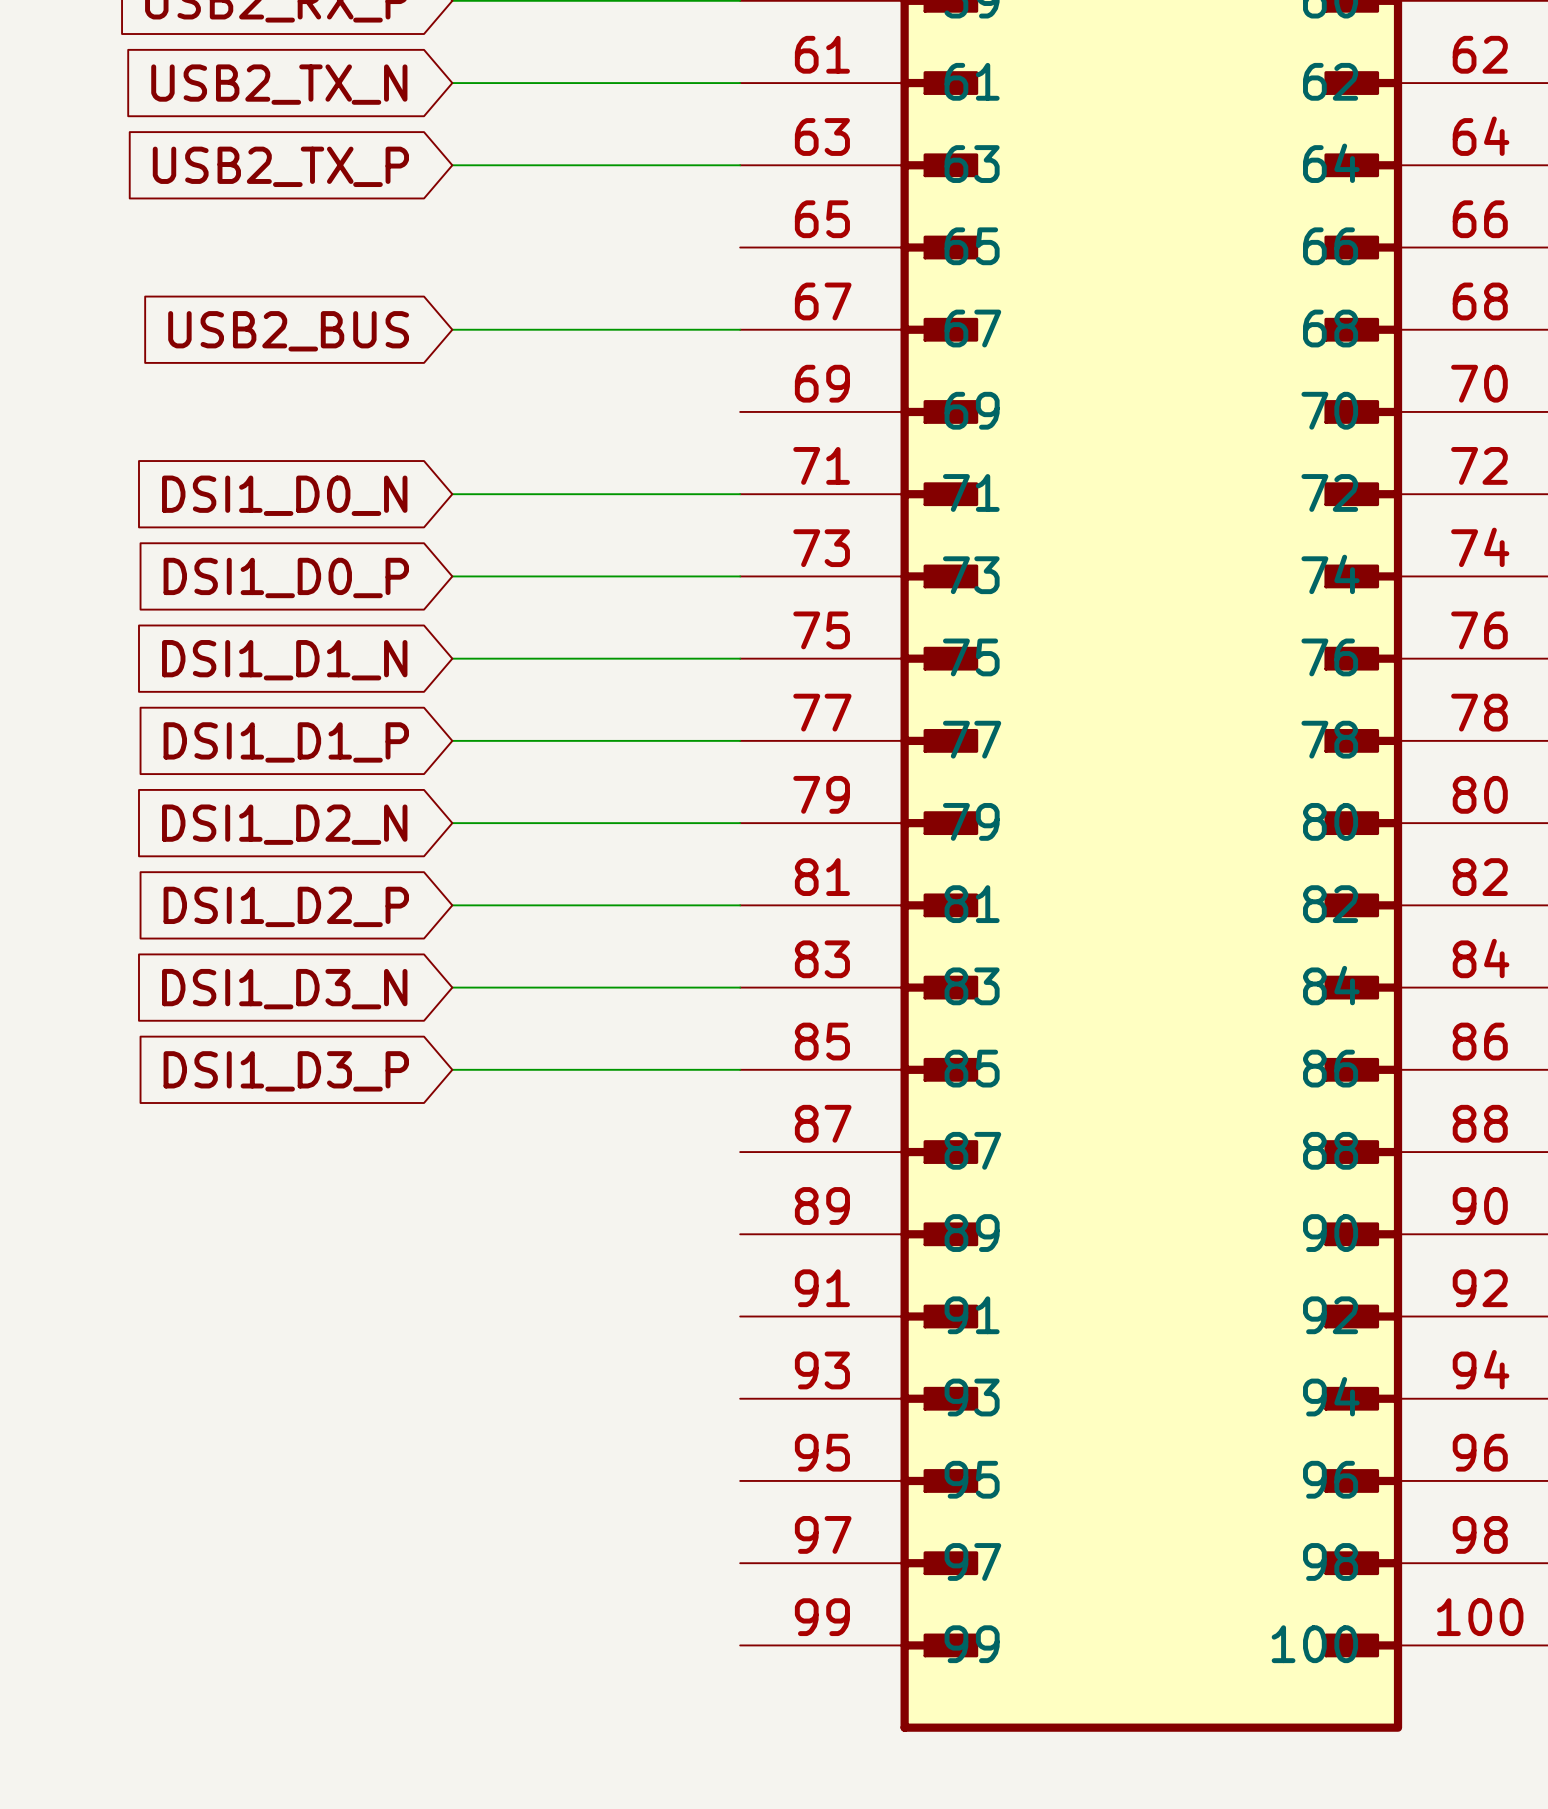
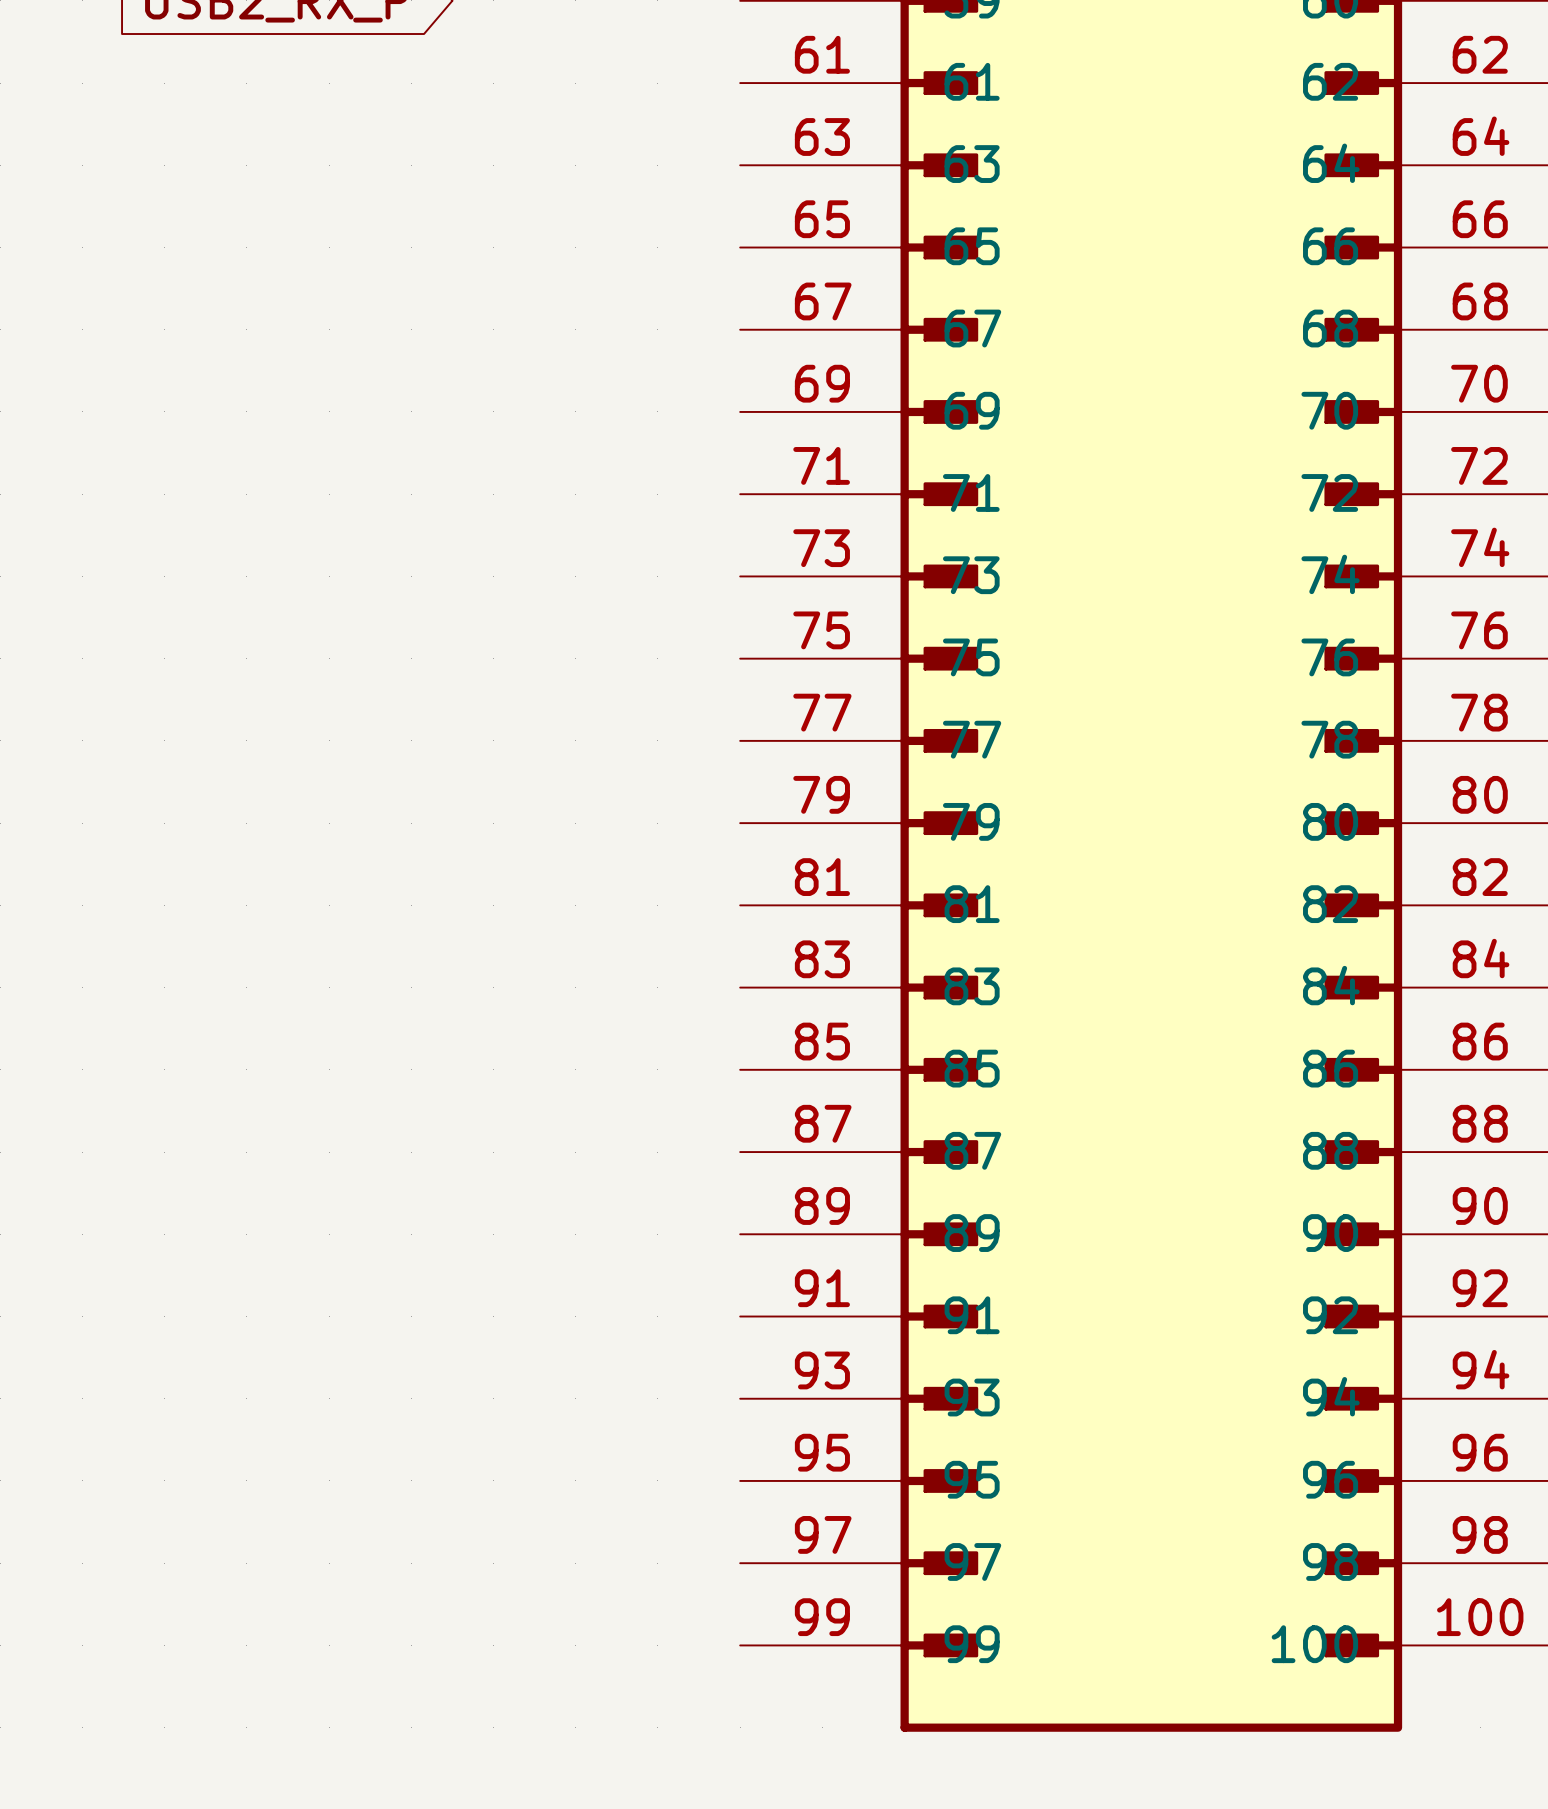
wire: (452, 0) (740, 0) -> none
wire: (452, 83) (740, 83) -> none
global label: USB2_TX_N (279, 84) -> none
wire: (452, 165) (740, 165) -> none
global label: USB2_TX_P (280, 166) -> none
wire: (452, 329) (740, 329) -> none
global label: USB2_BUS (288, 331) -> none
wire: (452, 494) (740, 494) -> none
global label: DSI1_D0_N (284, 495) -> none
wire: (452, 576) (740, 576) -> none
global label: DSI1_D0_P (286, 577) -> none
wire: (452, 658) (740, 658) -> none
global label: DSI1_D1_N (284, 660) -> none
wire: (452, 740) (740, 740) -> none
global label: DSI1_D1_P (286, 742) -> none
wire: (452, 823) (740, 823) -> none
global label: DSI1_D2_N (284, 824) -> none
wire: (452, 905) (740, 905) -> none
global label: DSI1_D2_P (286, 906) -> none
wire: (452, 987) (740, 987) -> none
global label: DSI1_D3_N (284, 989) -> none
wire: (452, 1069) (740, 1069) -> none
global label: DSI1_D3_P (286, 1071) -> none

